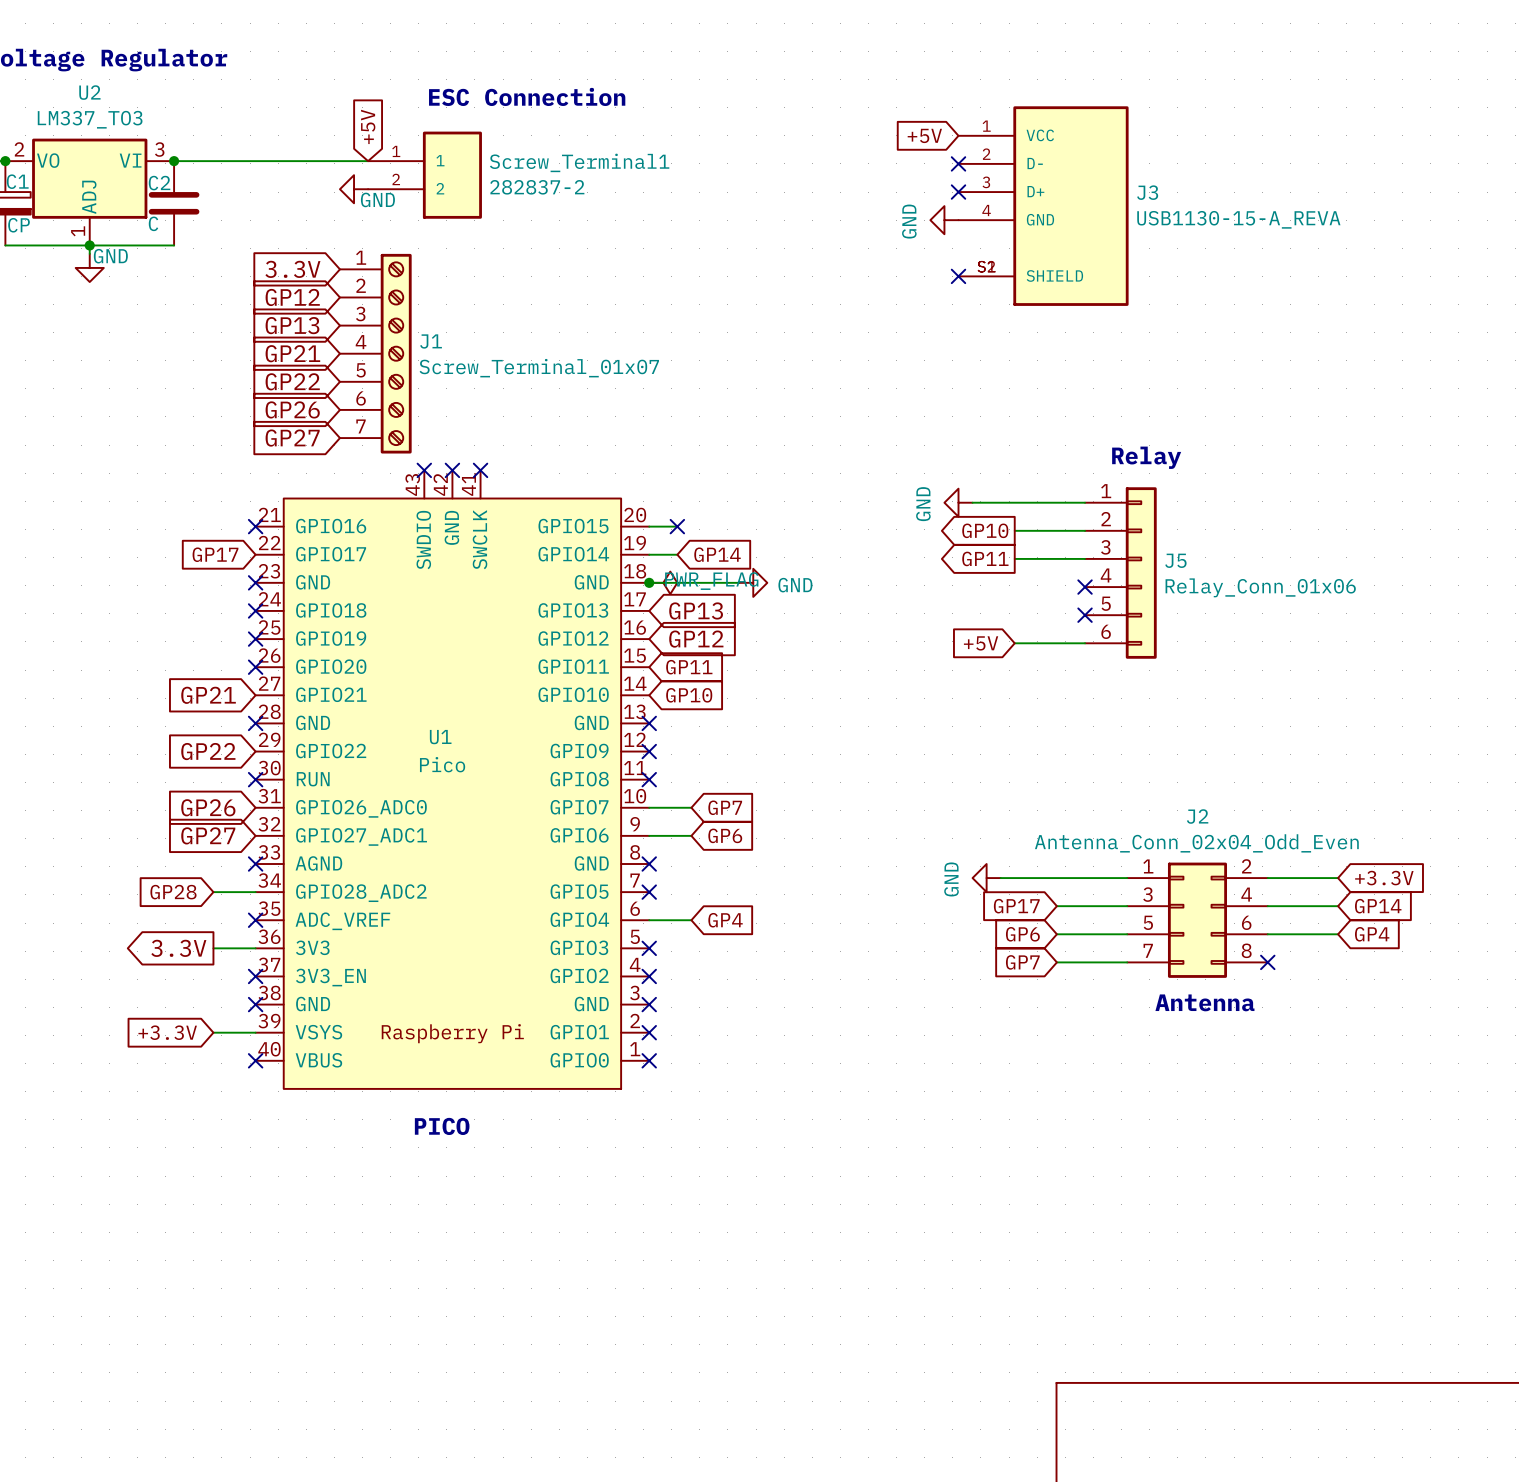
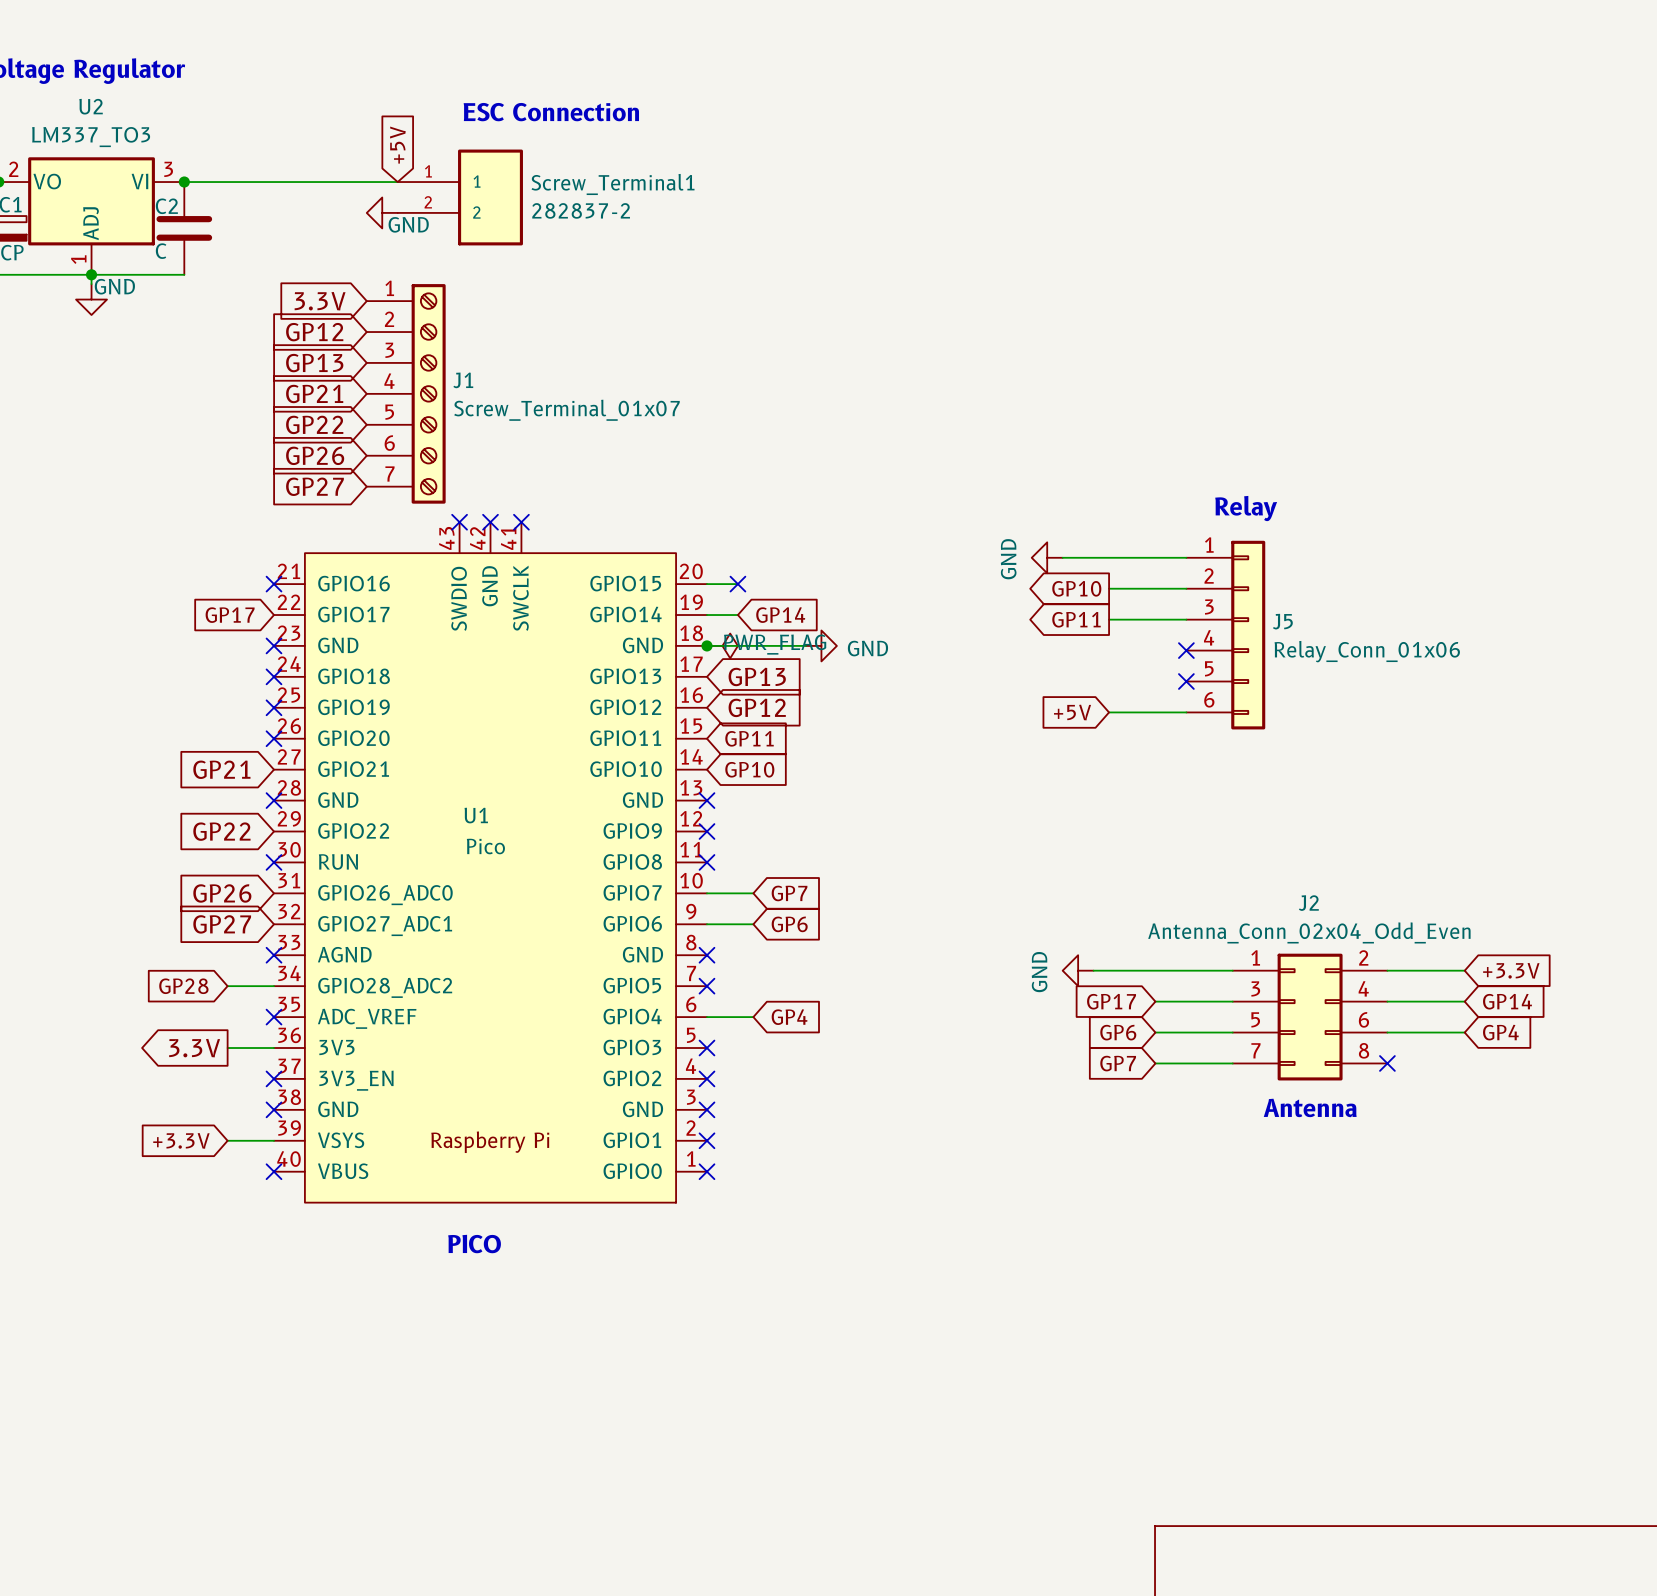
global label: +5V (924, 135) -> none
no-connect mark: (958, 163) -> none
no-connect mark: (958, 192) -> none
J3: USB1130-15-A_REVA (1043, 206) -> none
power symbol: GND (944, 220) -> none
no-connect mark: (958, 276) -> none

